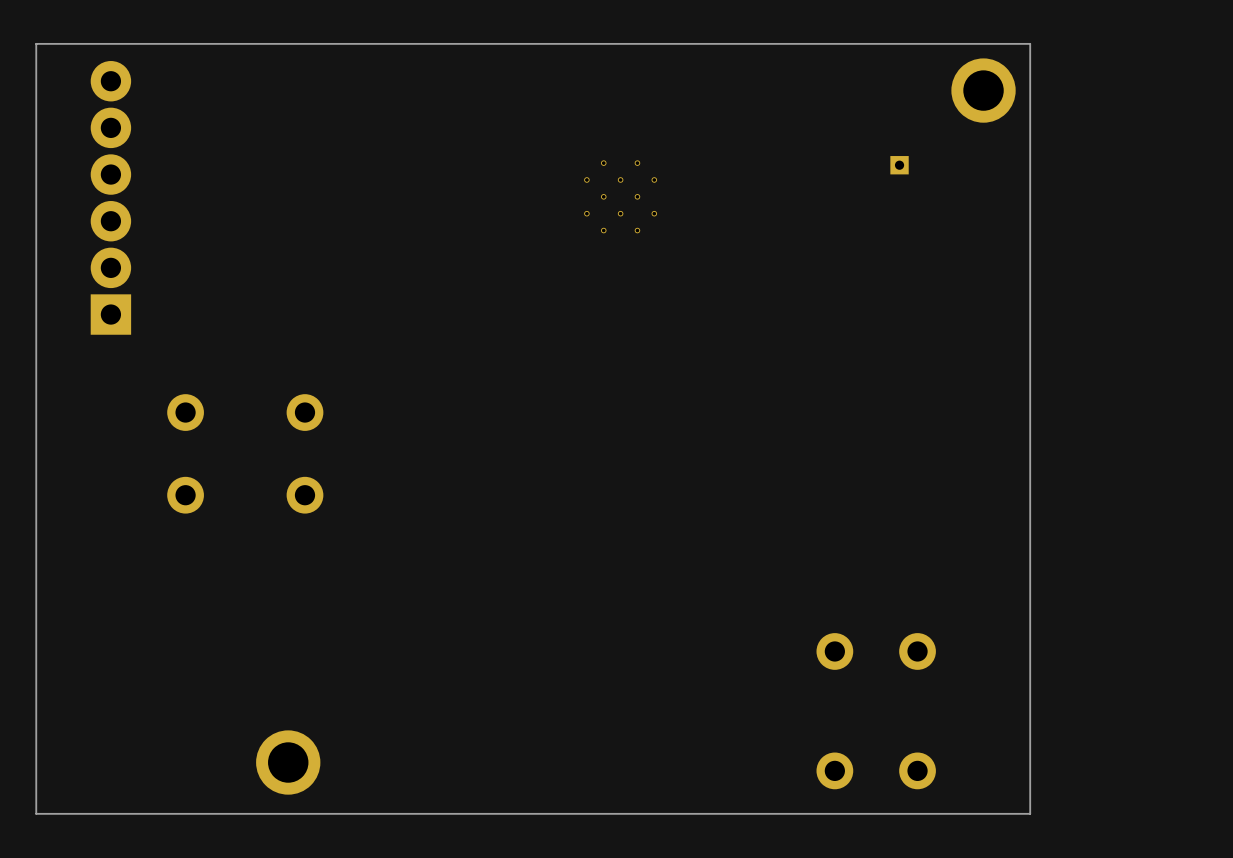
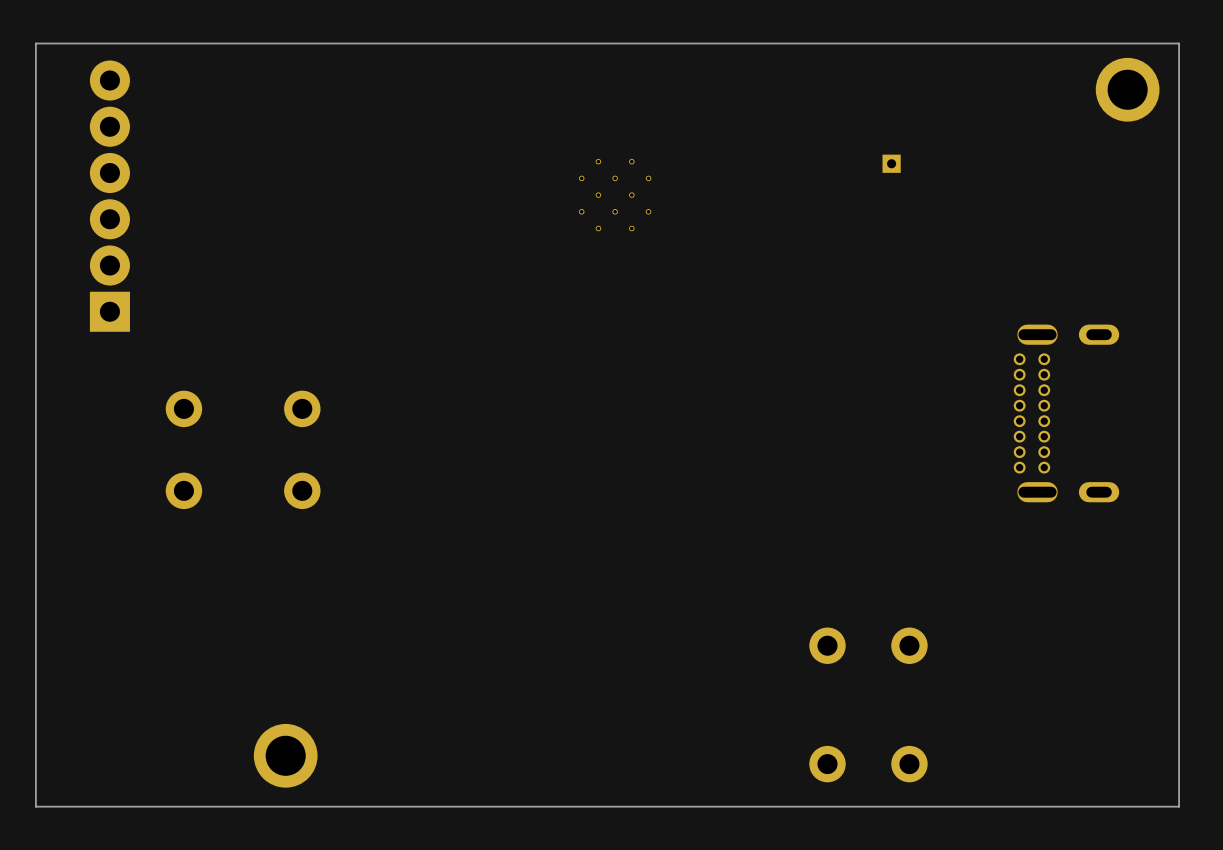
board edge: (1030, 43) (1030, 813) -> (1021, 43) (1179, 43) (1179, 806) (1021, 806)
part position: (983, 90) -> (1127, 89)
part: none -> (1066, 413)

